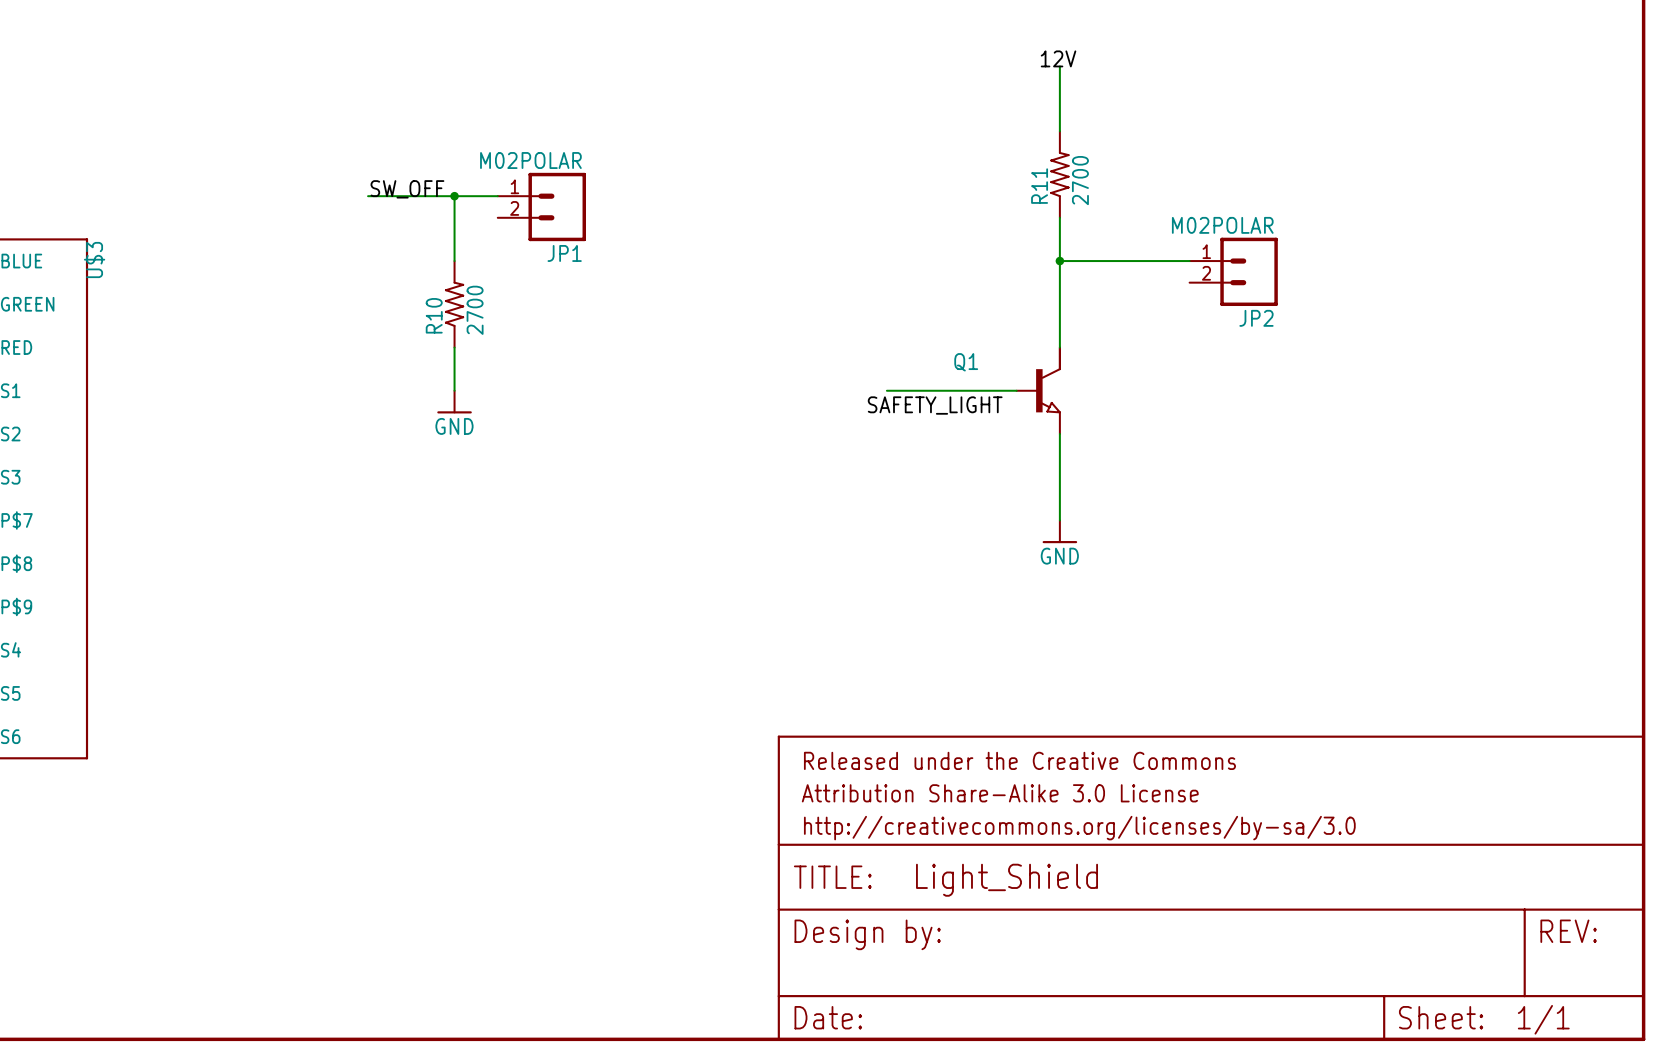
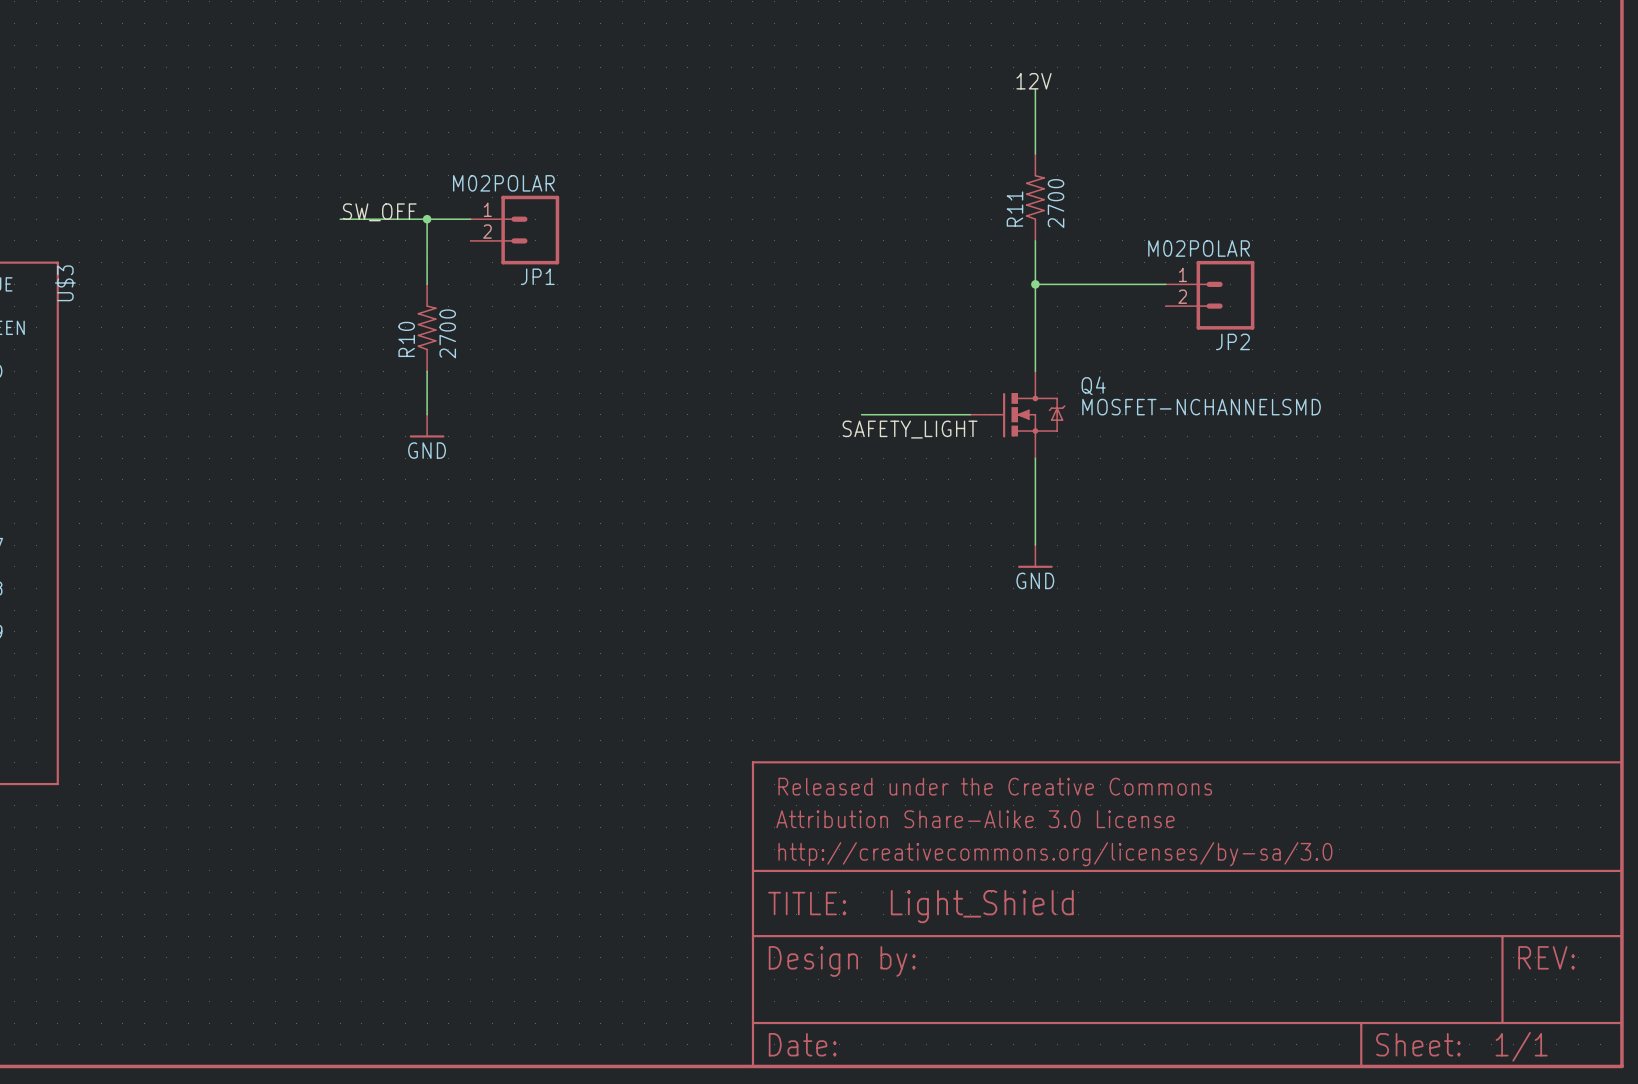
Q1: (1038, 390) -> none
Q4: none -> MOSFET-NCHANNELSMD (1017, 414)

